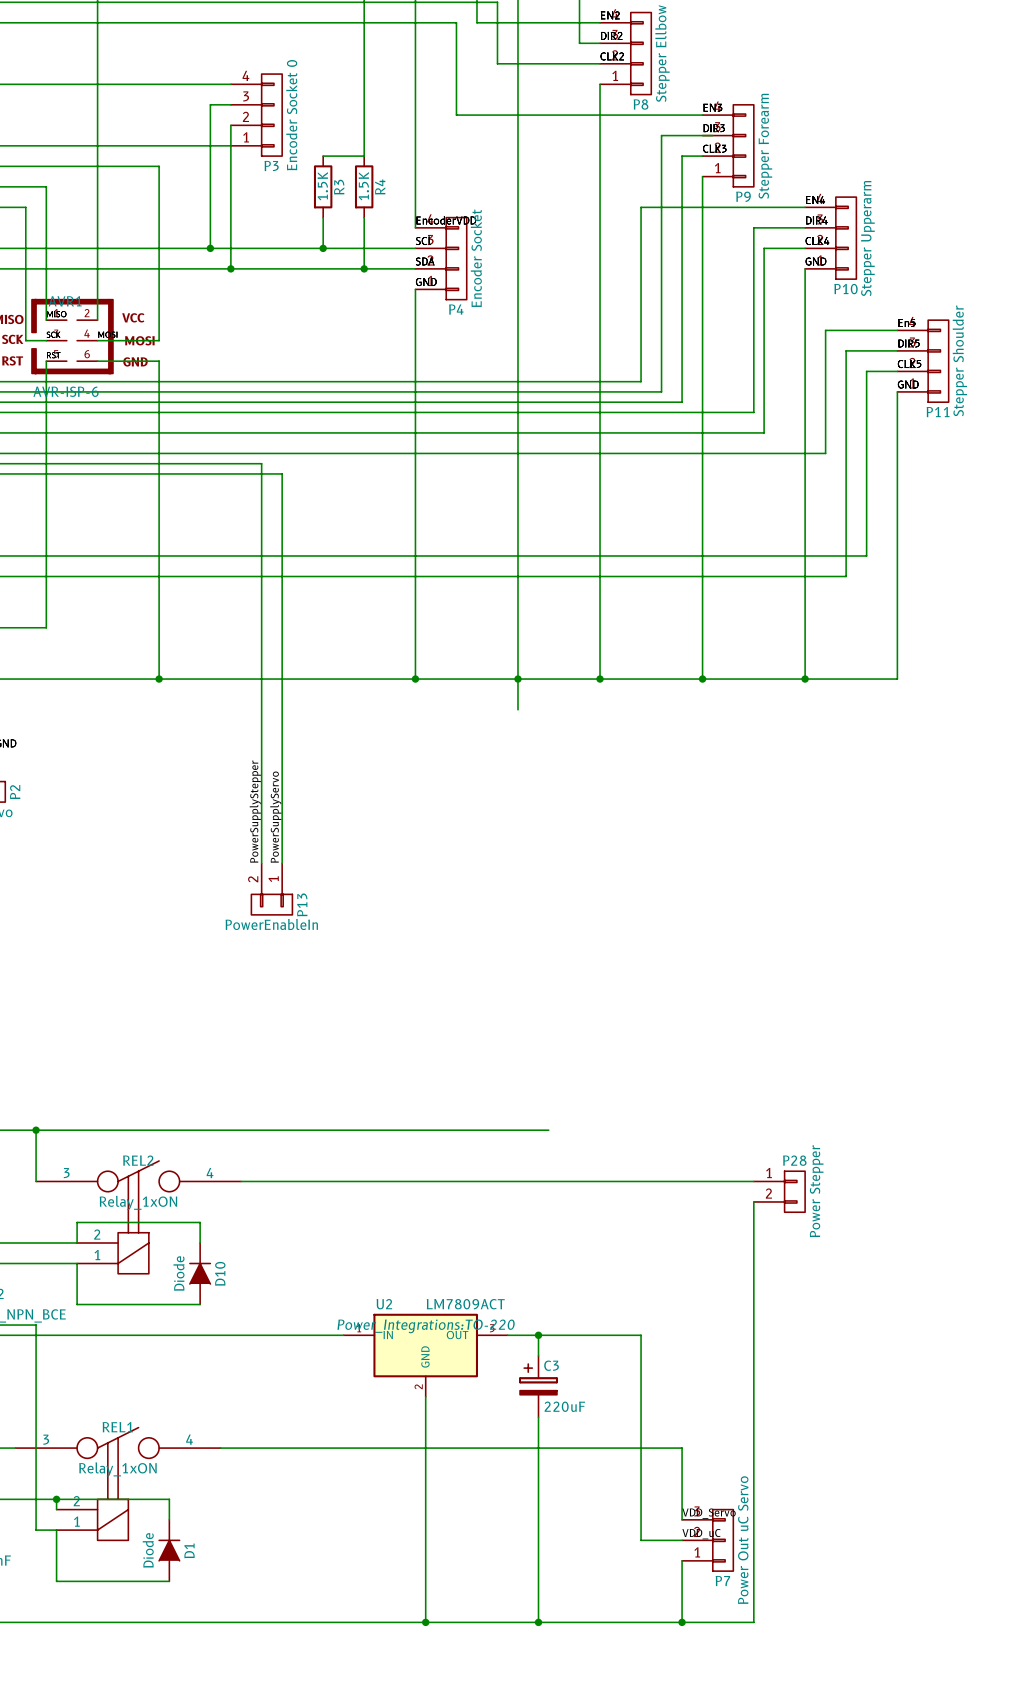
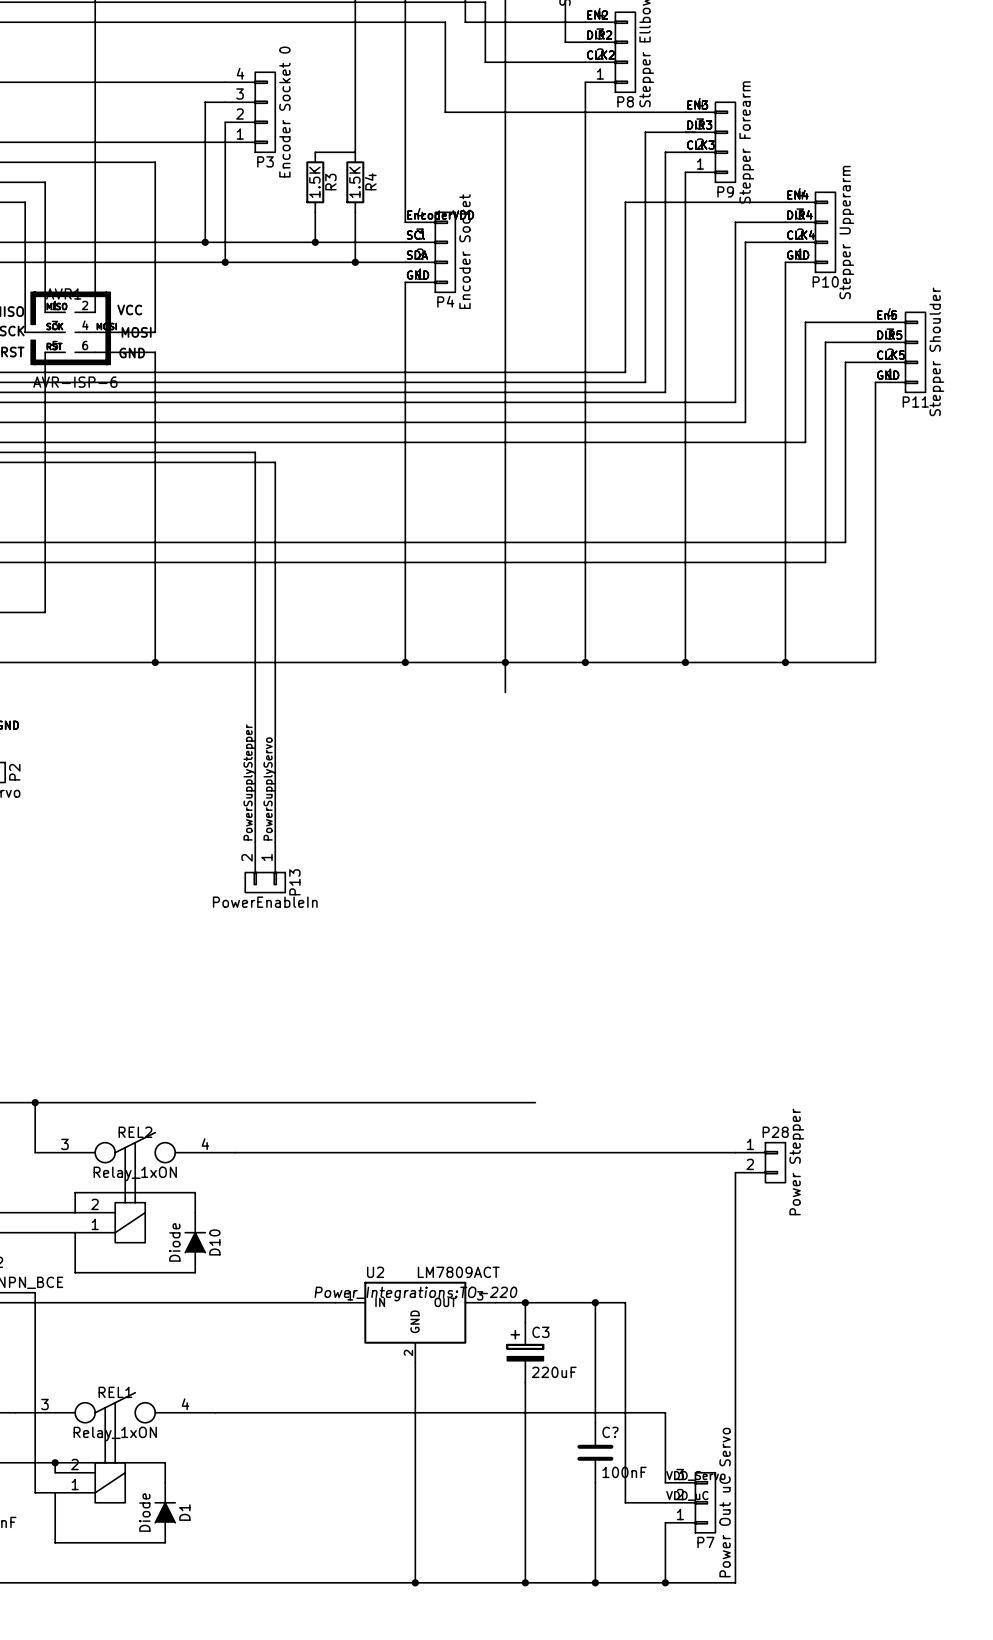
wire: none -> (595, 1302) (595, 1422)
junction: none -> (595, 1302)
C?: none -> 100nF (595, 1452)
wire: none -> (595, 1482) (595, 1582)
junction: none -> (595, 1582)

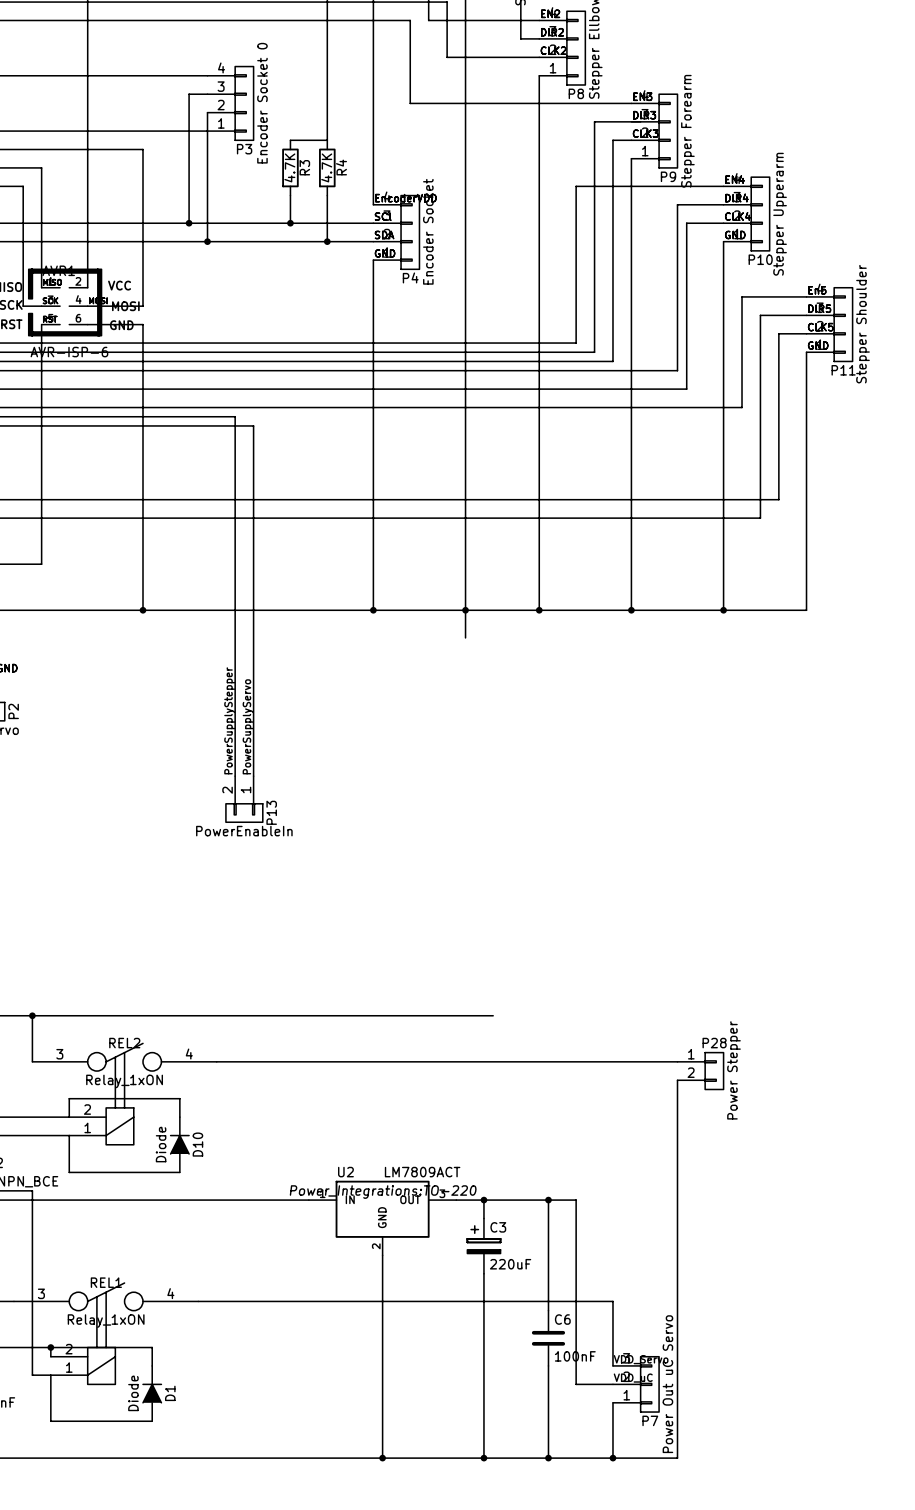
R3 value: 1.5K (314, 182) -> 4.7K (289, 167)
R4 value: 1.5K (354, 182) -> 4.7K (326, 167)
C? name: C? (610, 1432) -> C6 (562, 1319)

